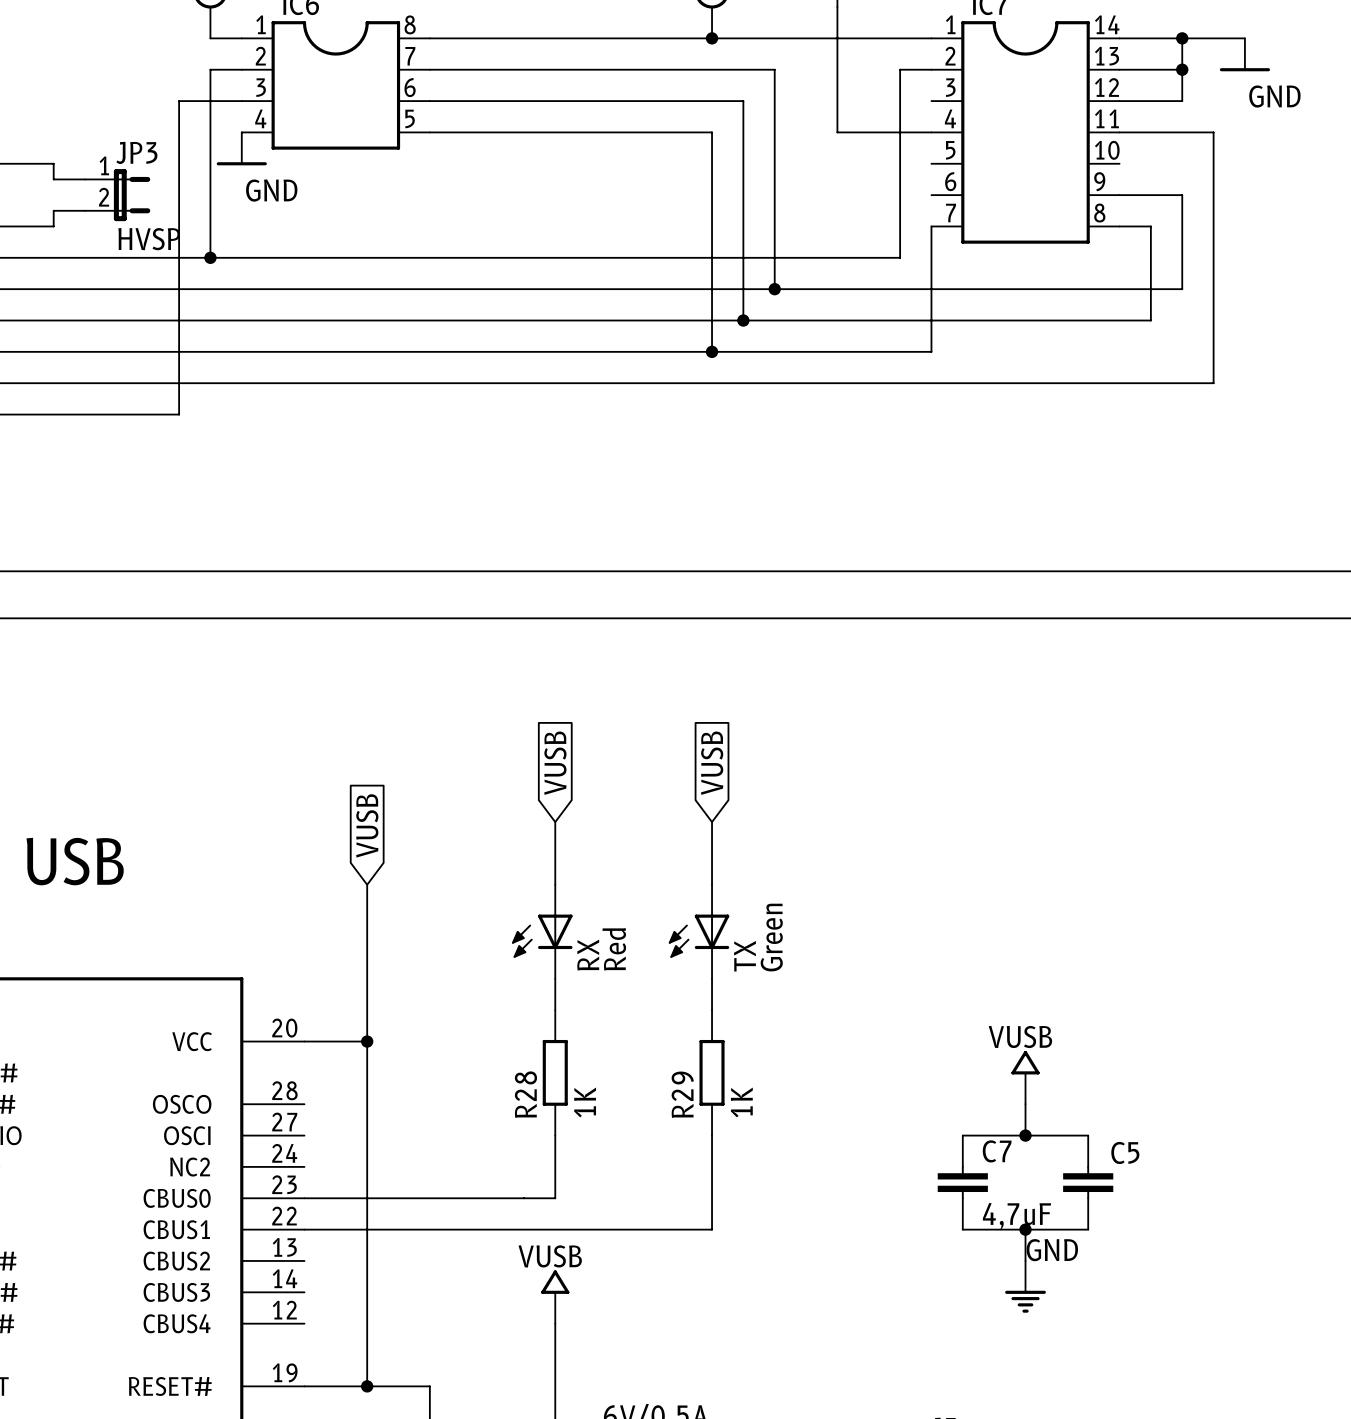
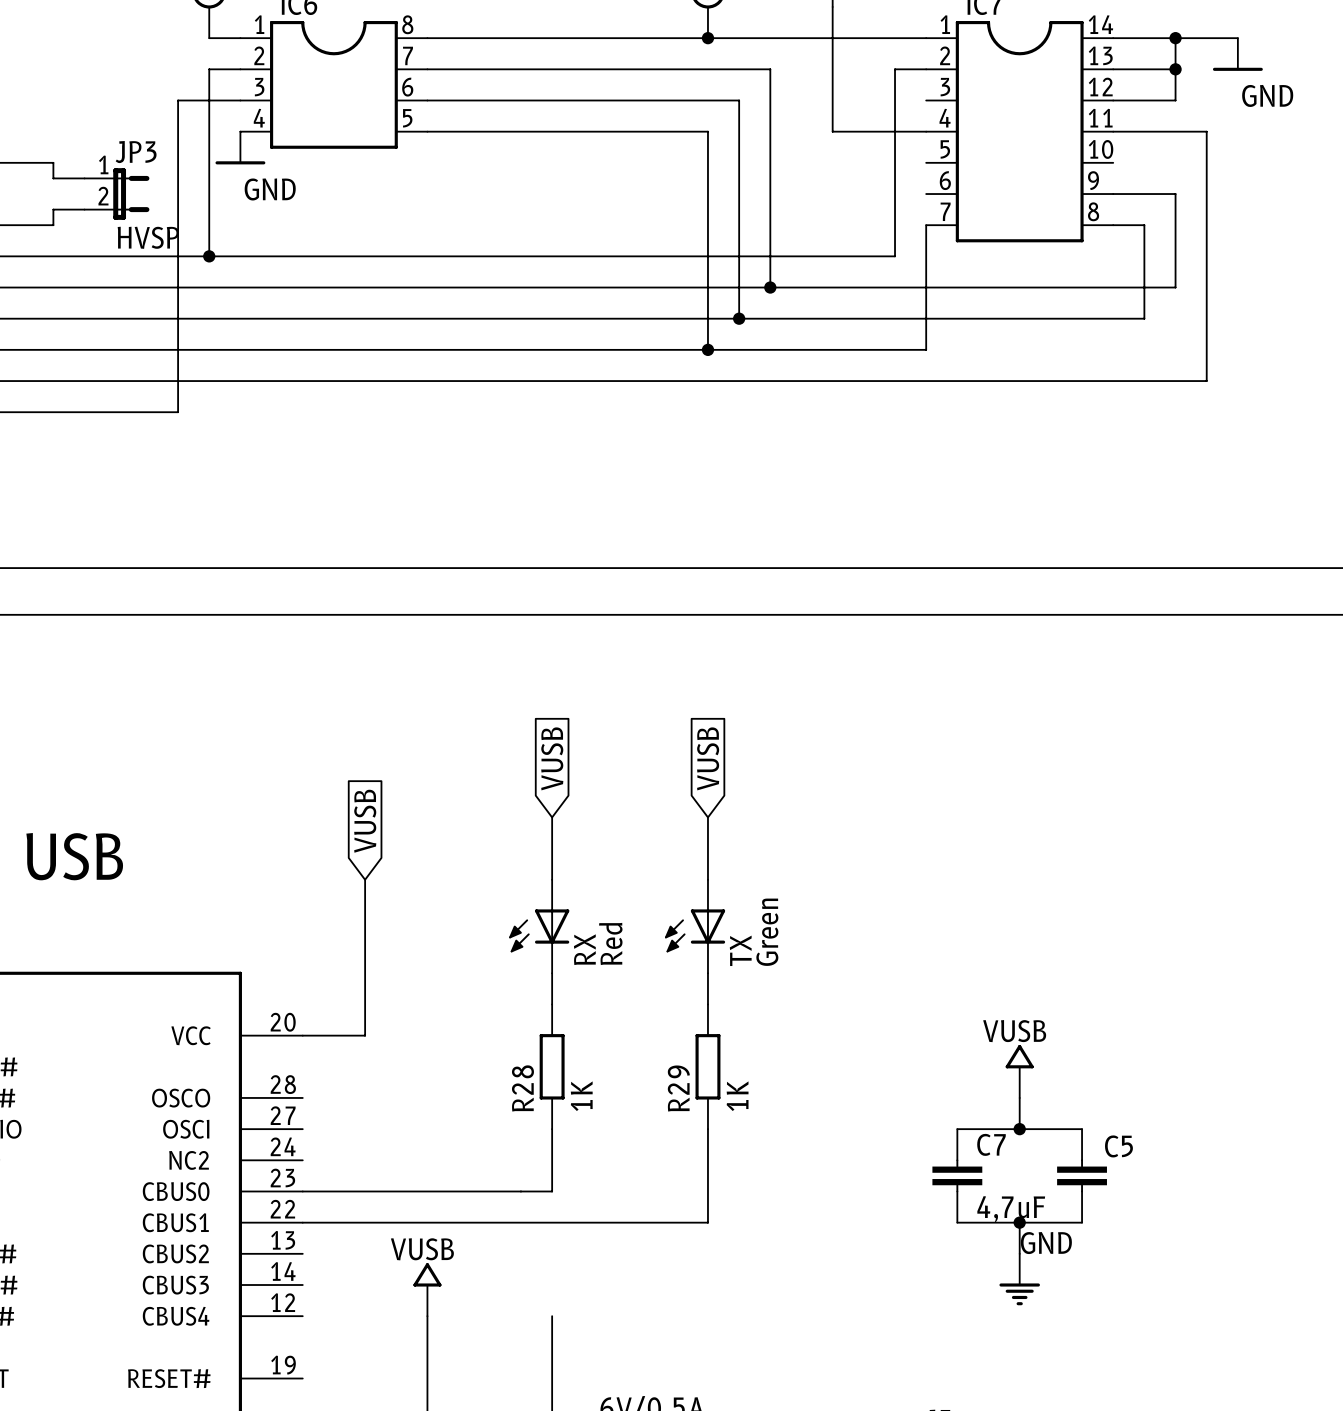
wire: (367, 1041) (367, 1386) -> none
junction: (367, 1041) -> none
power symbol position: VUSB (555, 1297) -> VUSB (427, 1289)
wire: (304, 1386) (429, 1386) -> (427, 1316) (427, 1378)
junction: (367, 1386) -> none

